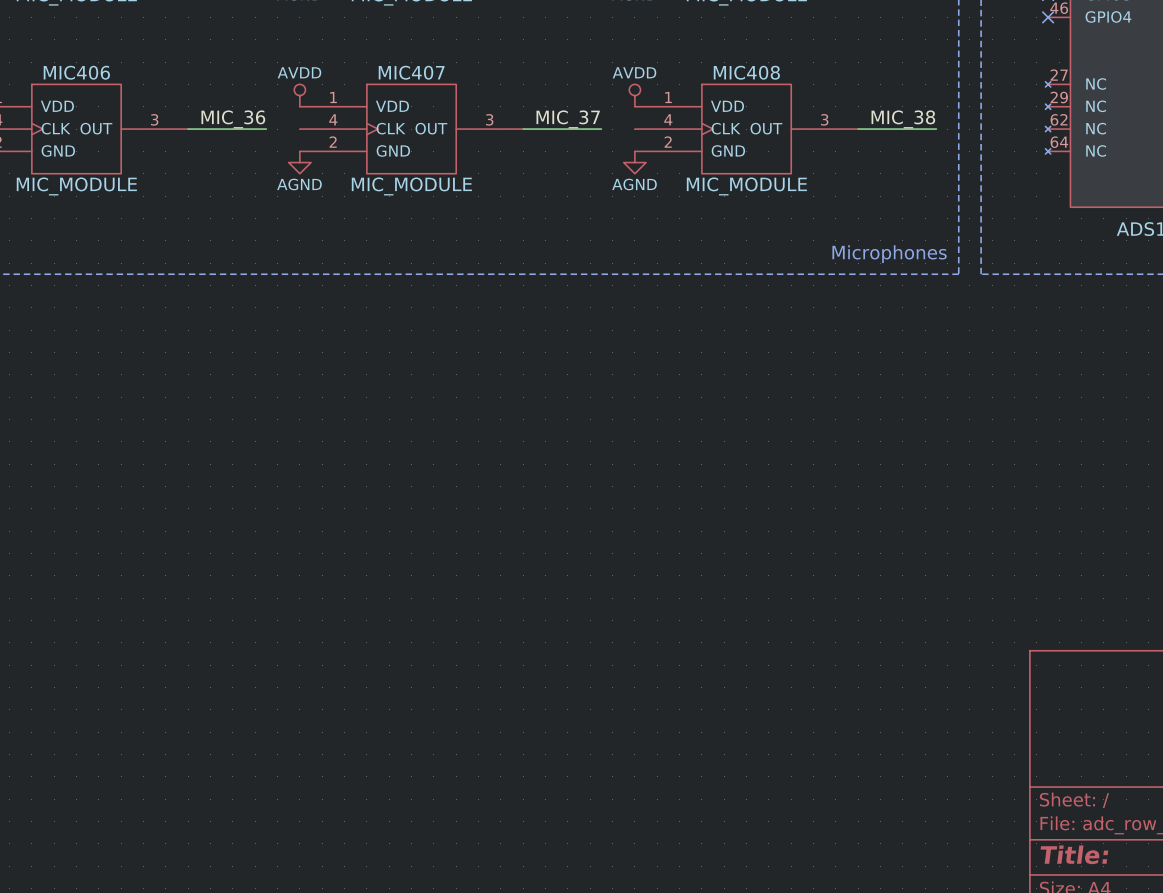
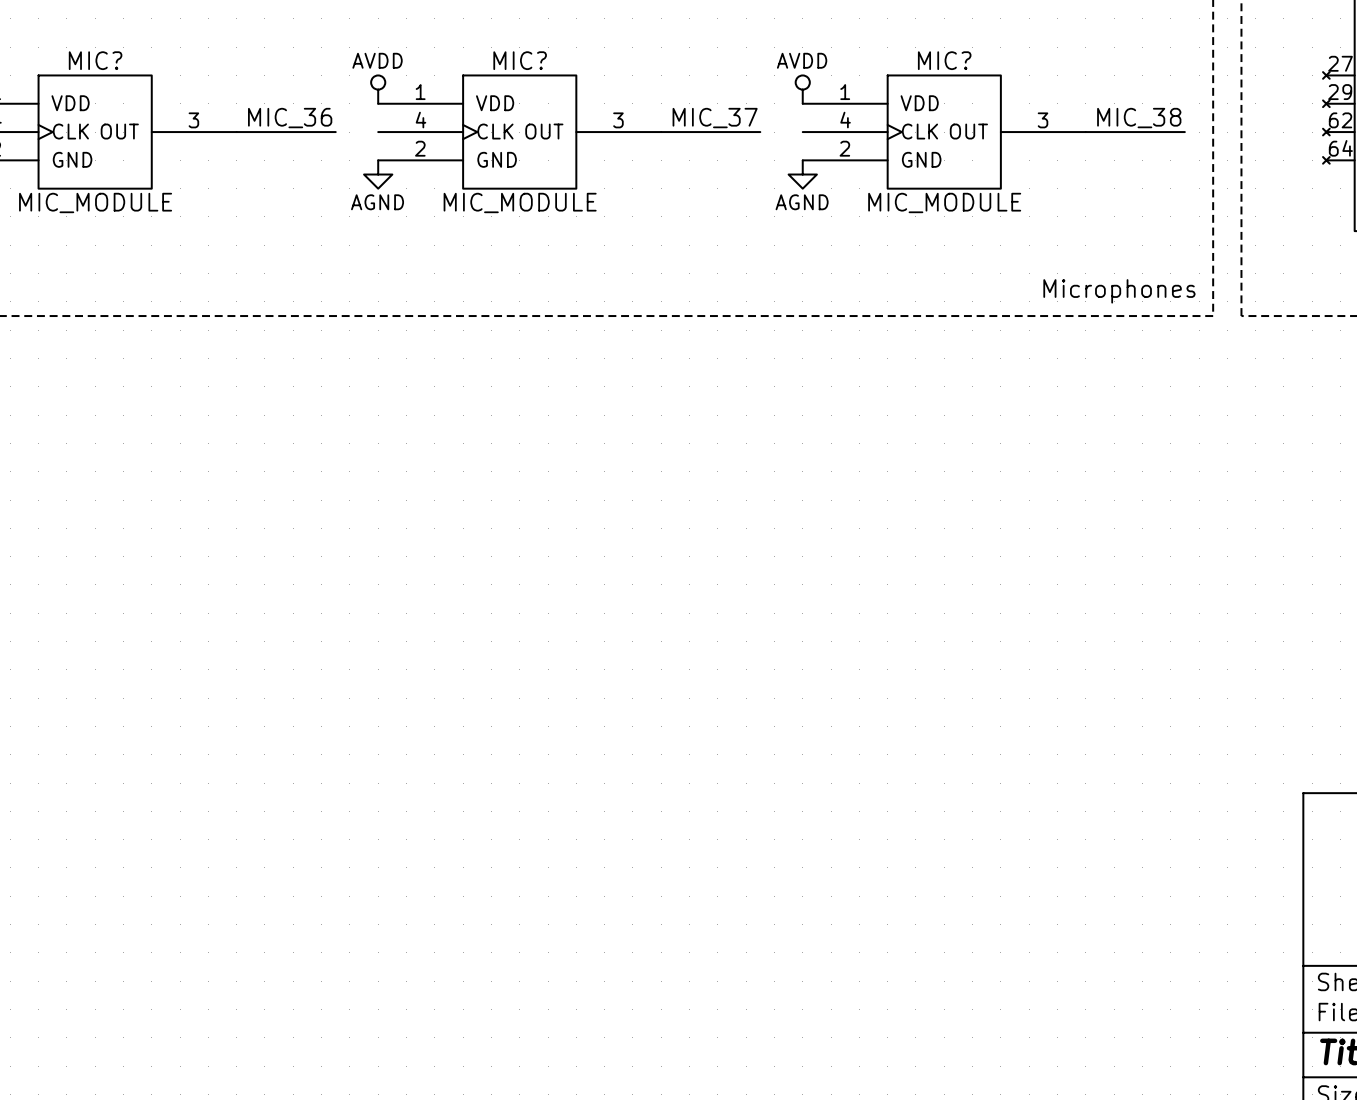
MIC406 name: MIC406 (76, 72) -> MIC? (95, 60)
MIC407 name: MIC407 (411, 72) -> MIC? (520, 60)
MIC408 name: MIC408 (746, 72) -> MIC? (944, 60)

